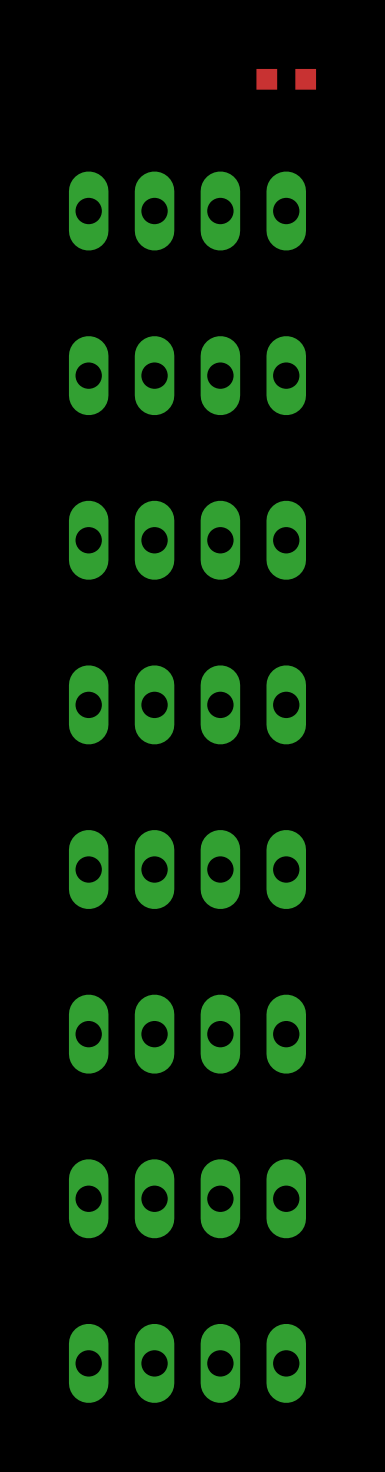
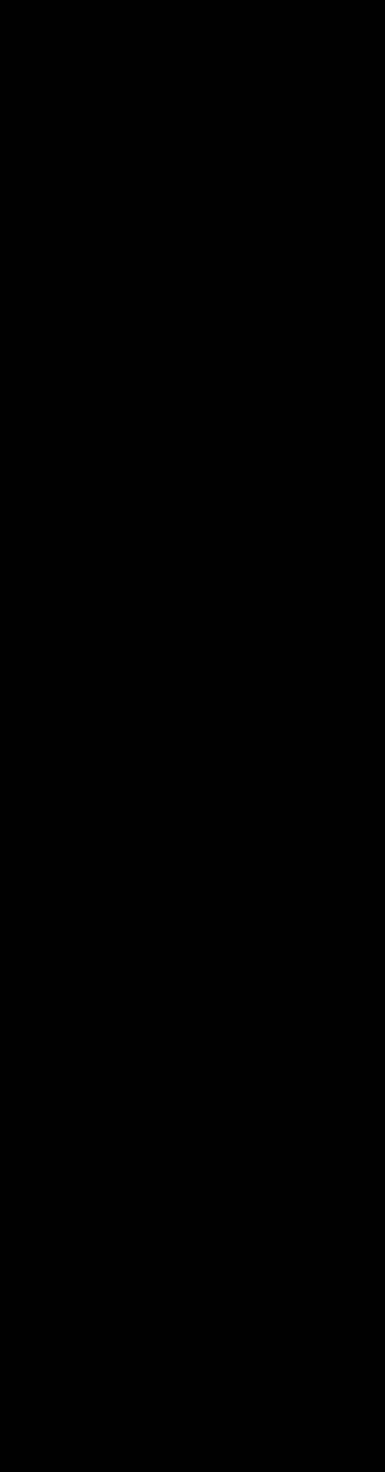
part: (286, 79) -> none
part: (187, 211) -> none
part: (187, 375) -> none
part: (187, 540) -> none
part: (187, 704) -> none
part: (187, 869) -> none
part: (187, 1034) -> none
part: (187, 1198) -> none
part: (187, 1363) -> none

